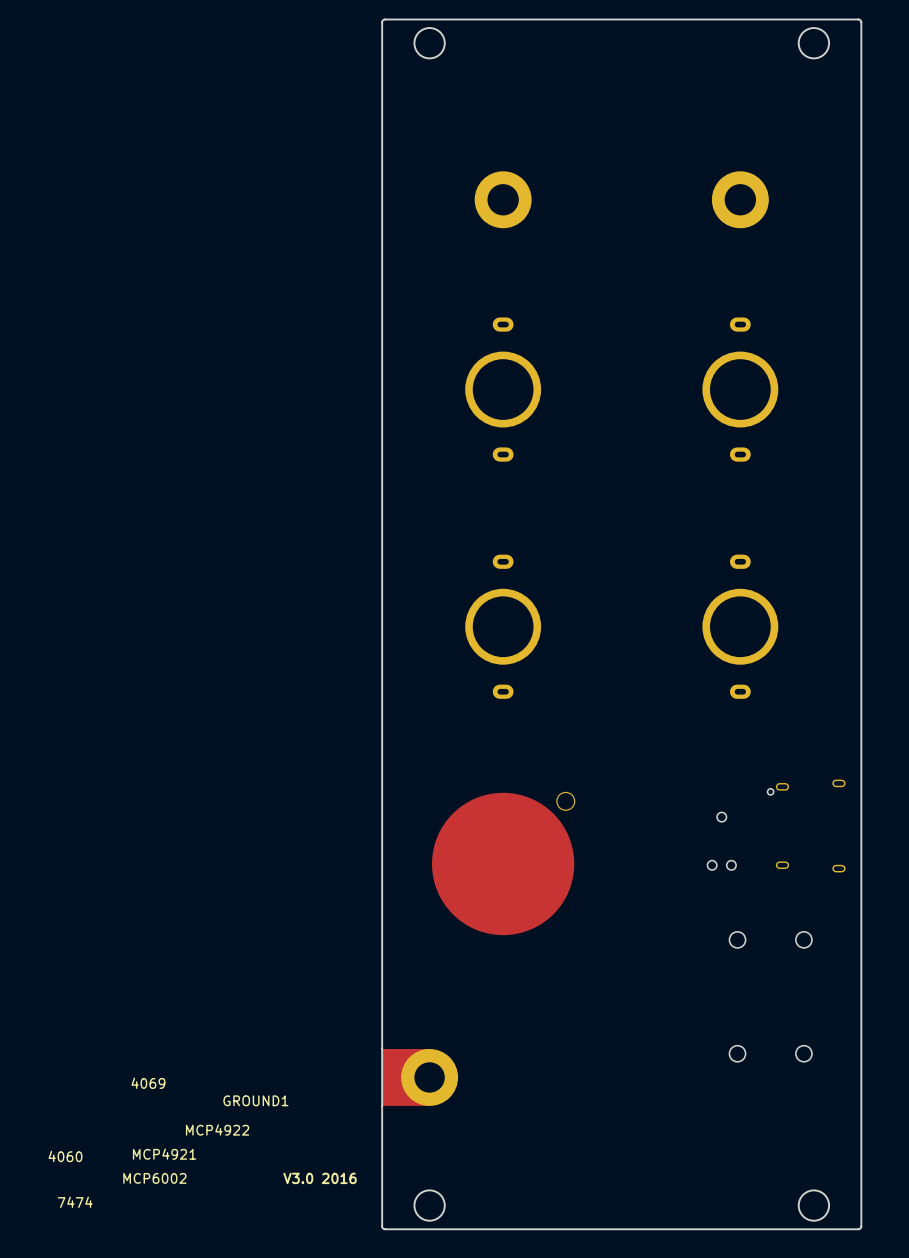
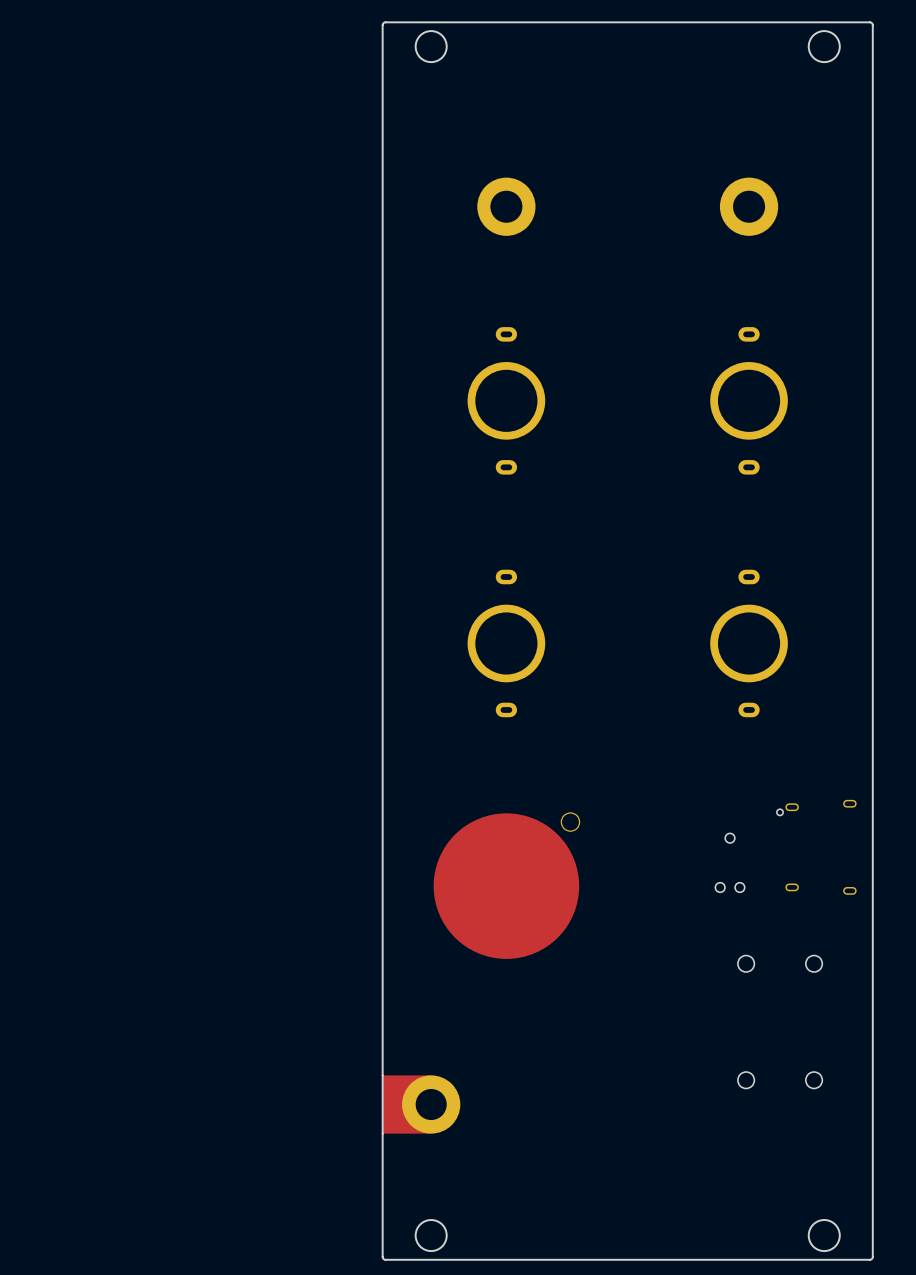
text: 4069 (148, 1083) -> none
GROUND1 name: GROUND1 (255, 1100) -> none
text: MCP4922 (217, 1129) -> none
text: MCP4921 (164, 1154) -> none
text: 4060 (65, 1156) -> none
text: MCP6002 (154, 1178) -> none
text: V3.0 2016 (320, 1178) -> none
text: 7474 (75, 1202) -> none

